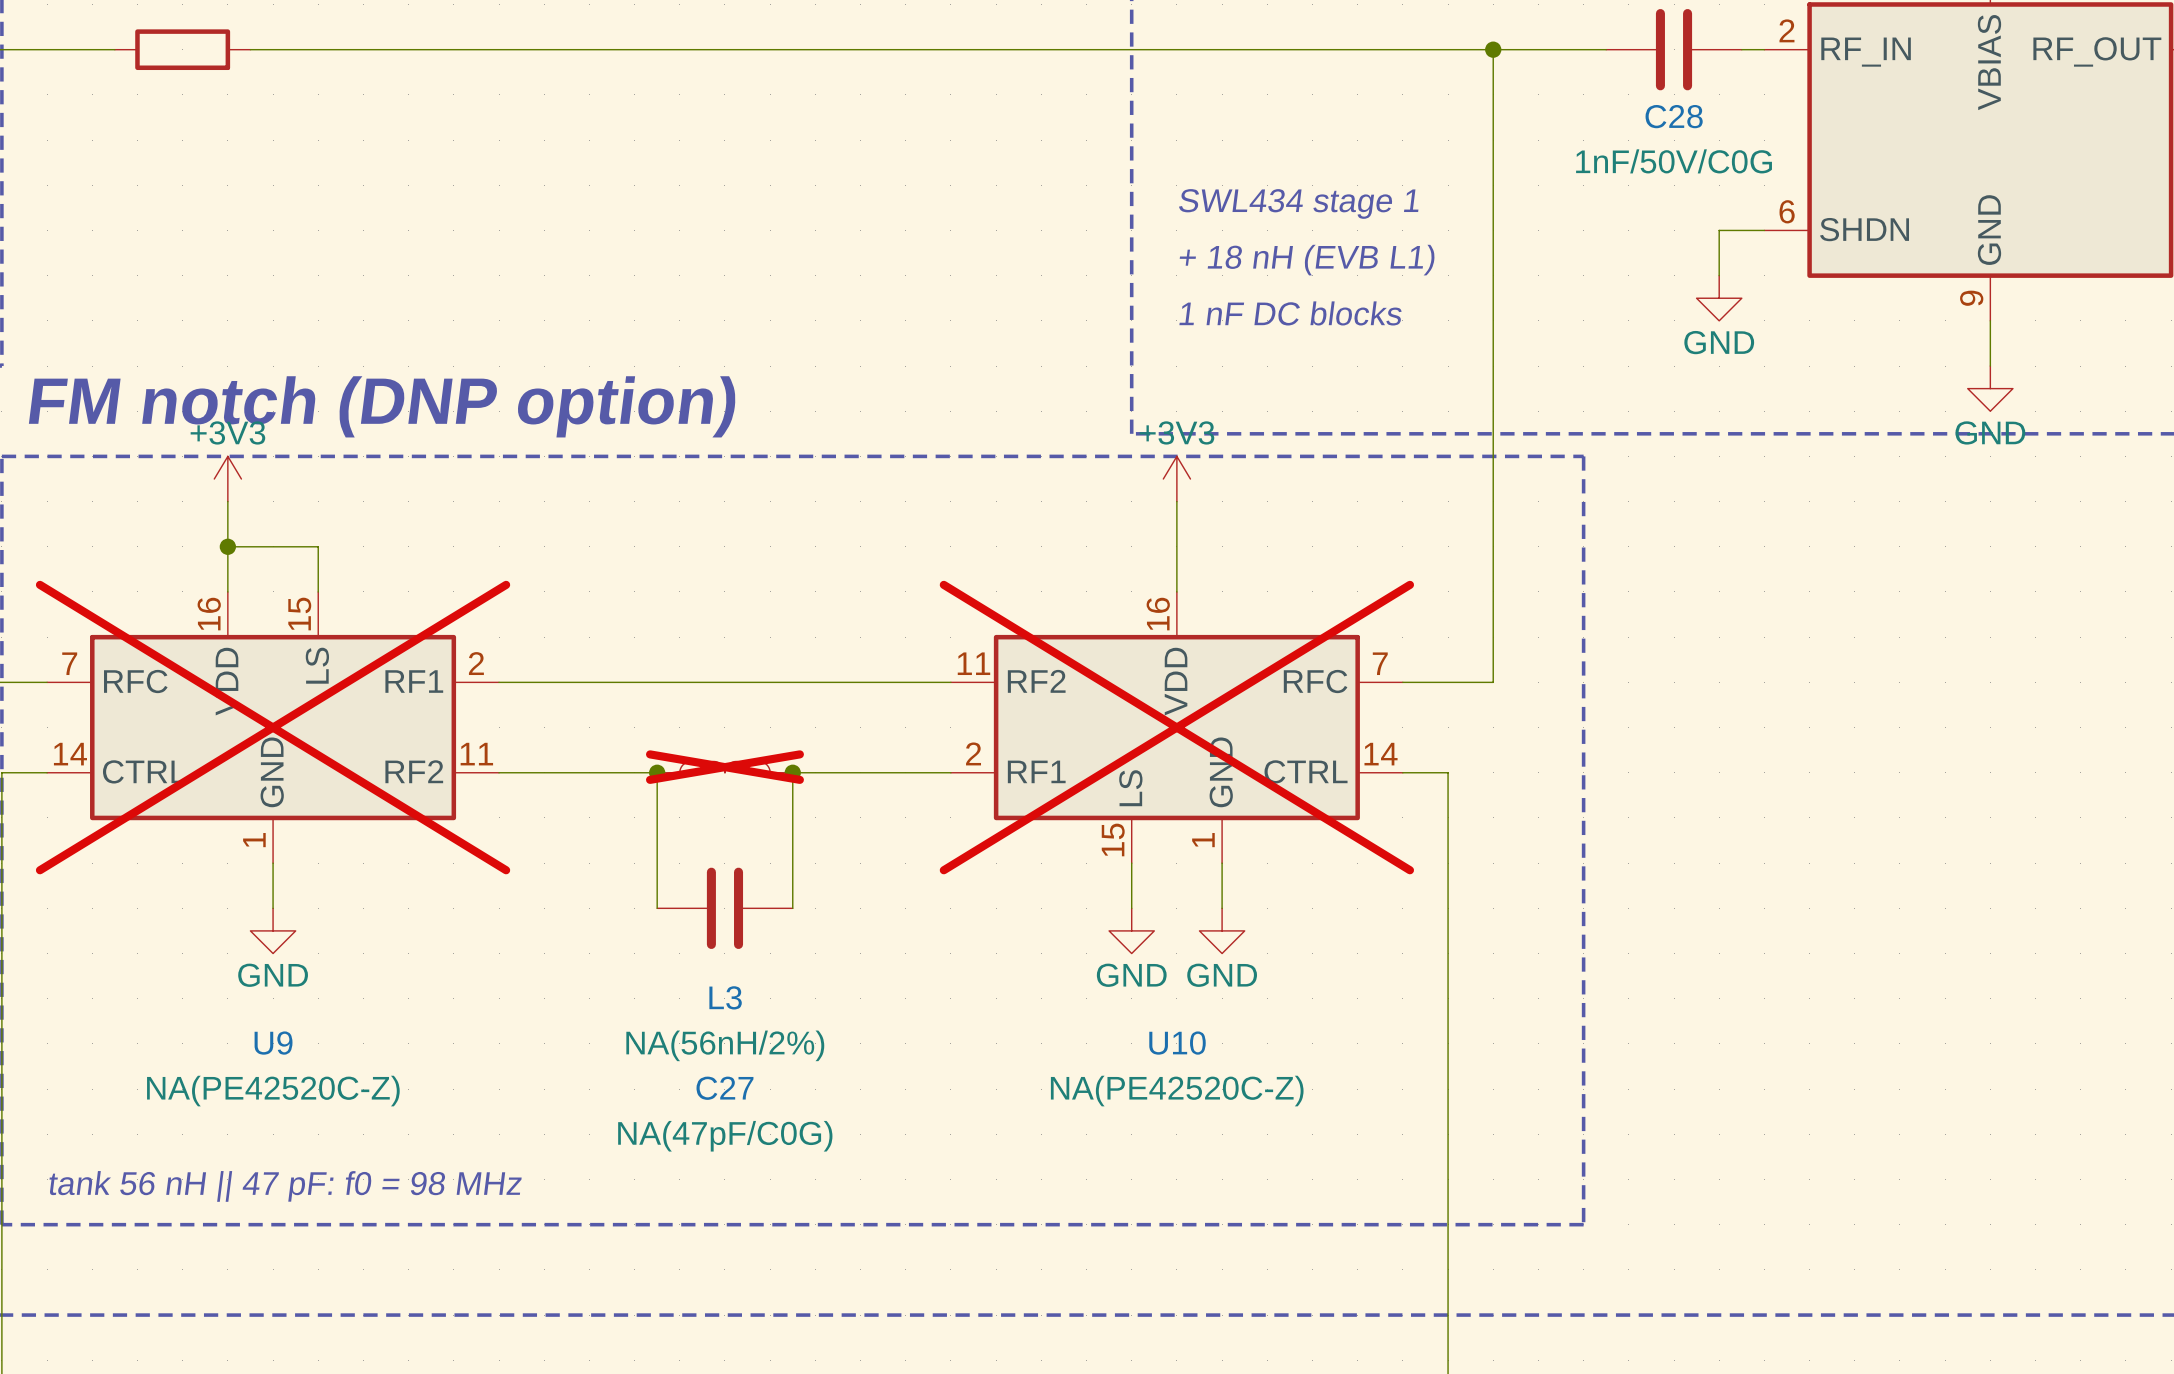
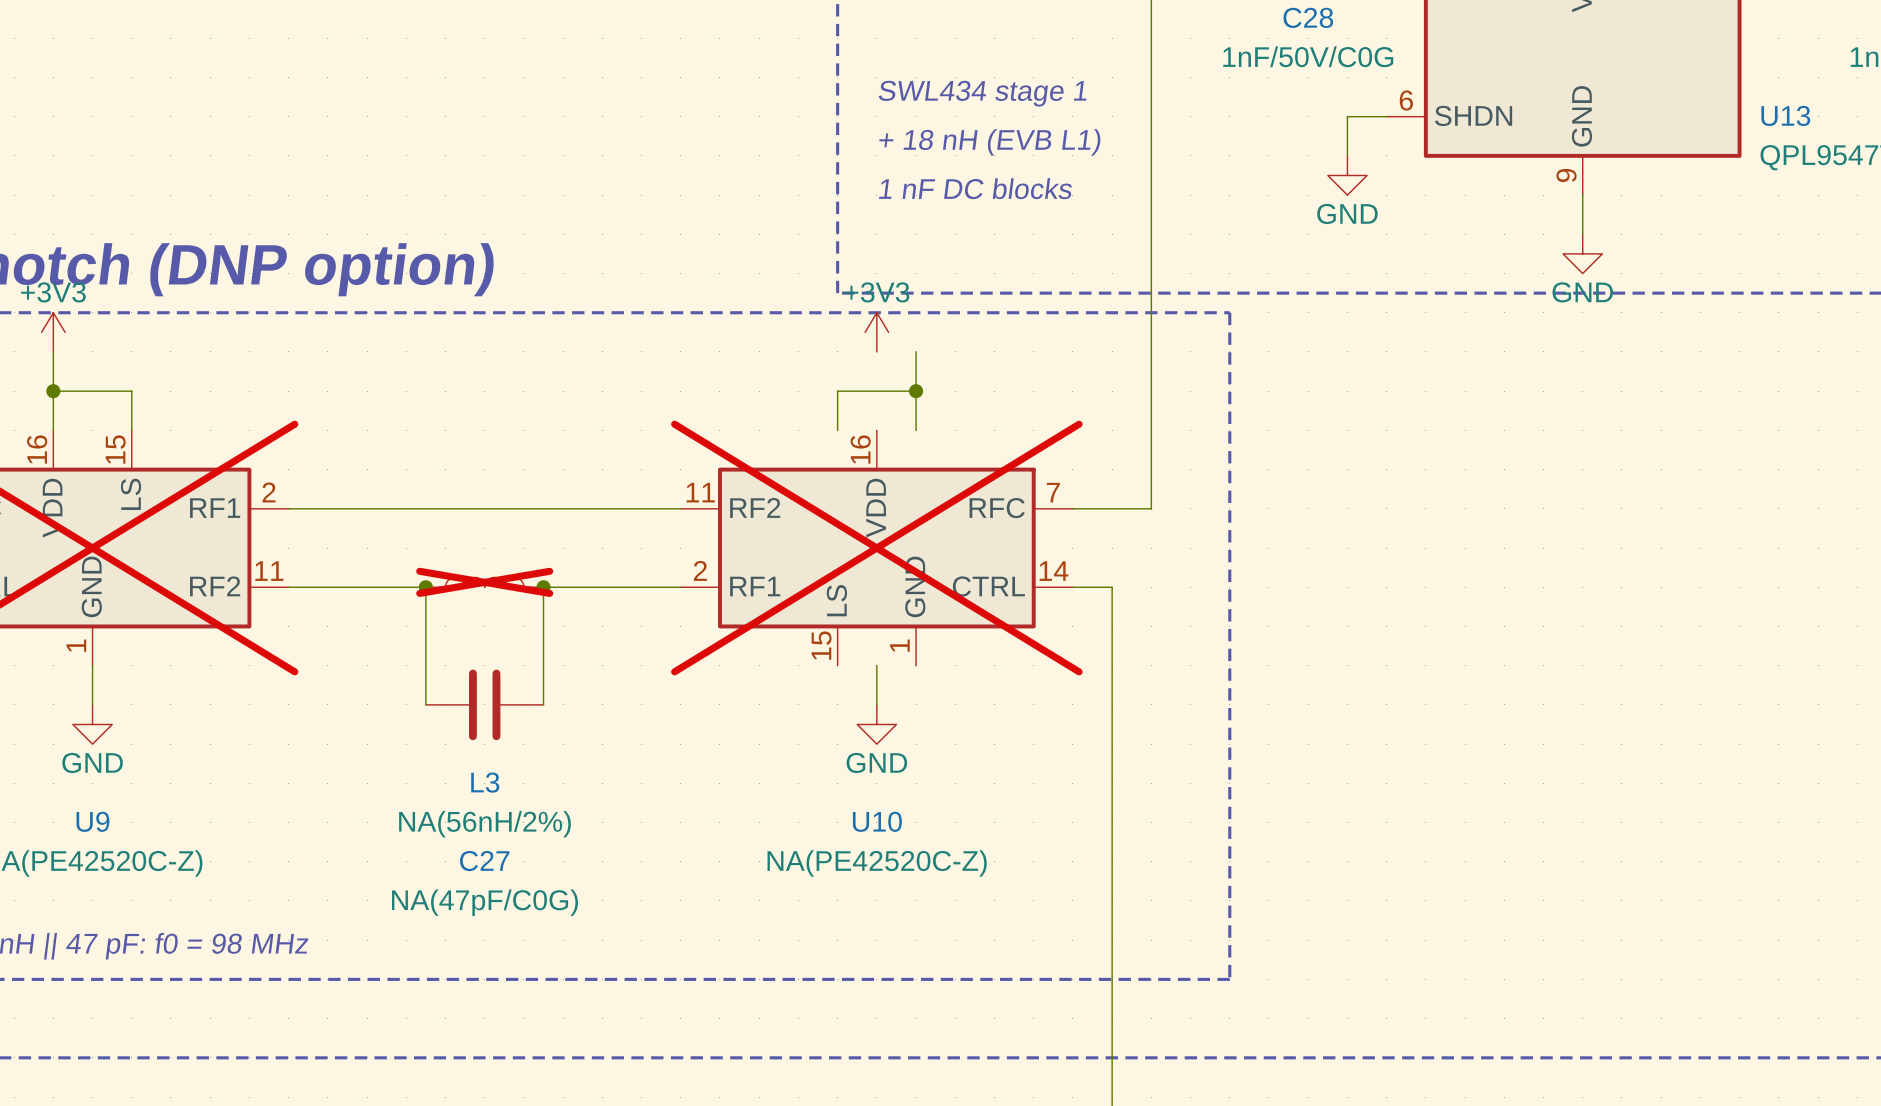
wire: (1176, 501) (1176, 591) -> (916, 351) (916, 430)
wire: none -> (916, 391) (837, 391) (837, 430)
junction: none -> (916, 391)
wire: (1131, 863) (1131, 908) -> (876, 665) (876, 704)
wire: (1222, 863) (1222, 908) -> none
power symbol: GND (1131, 930) -> none
power symbol: none -> GND (876, 724)
power symbol: GND (1222, 930) -> none

